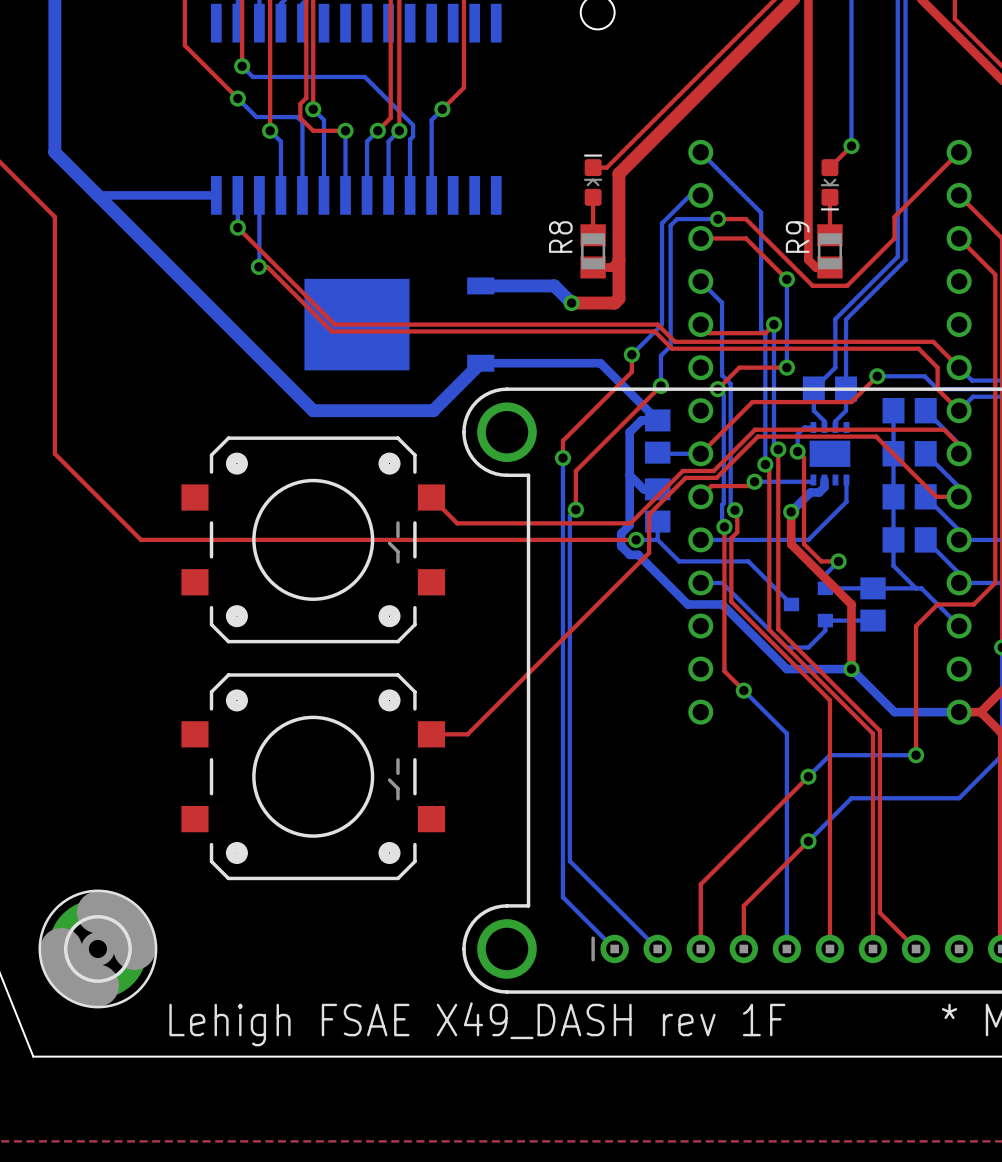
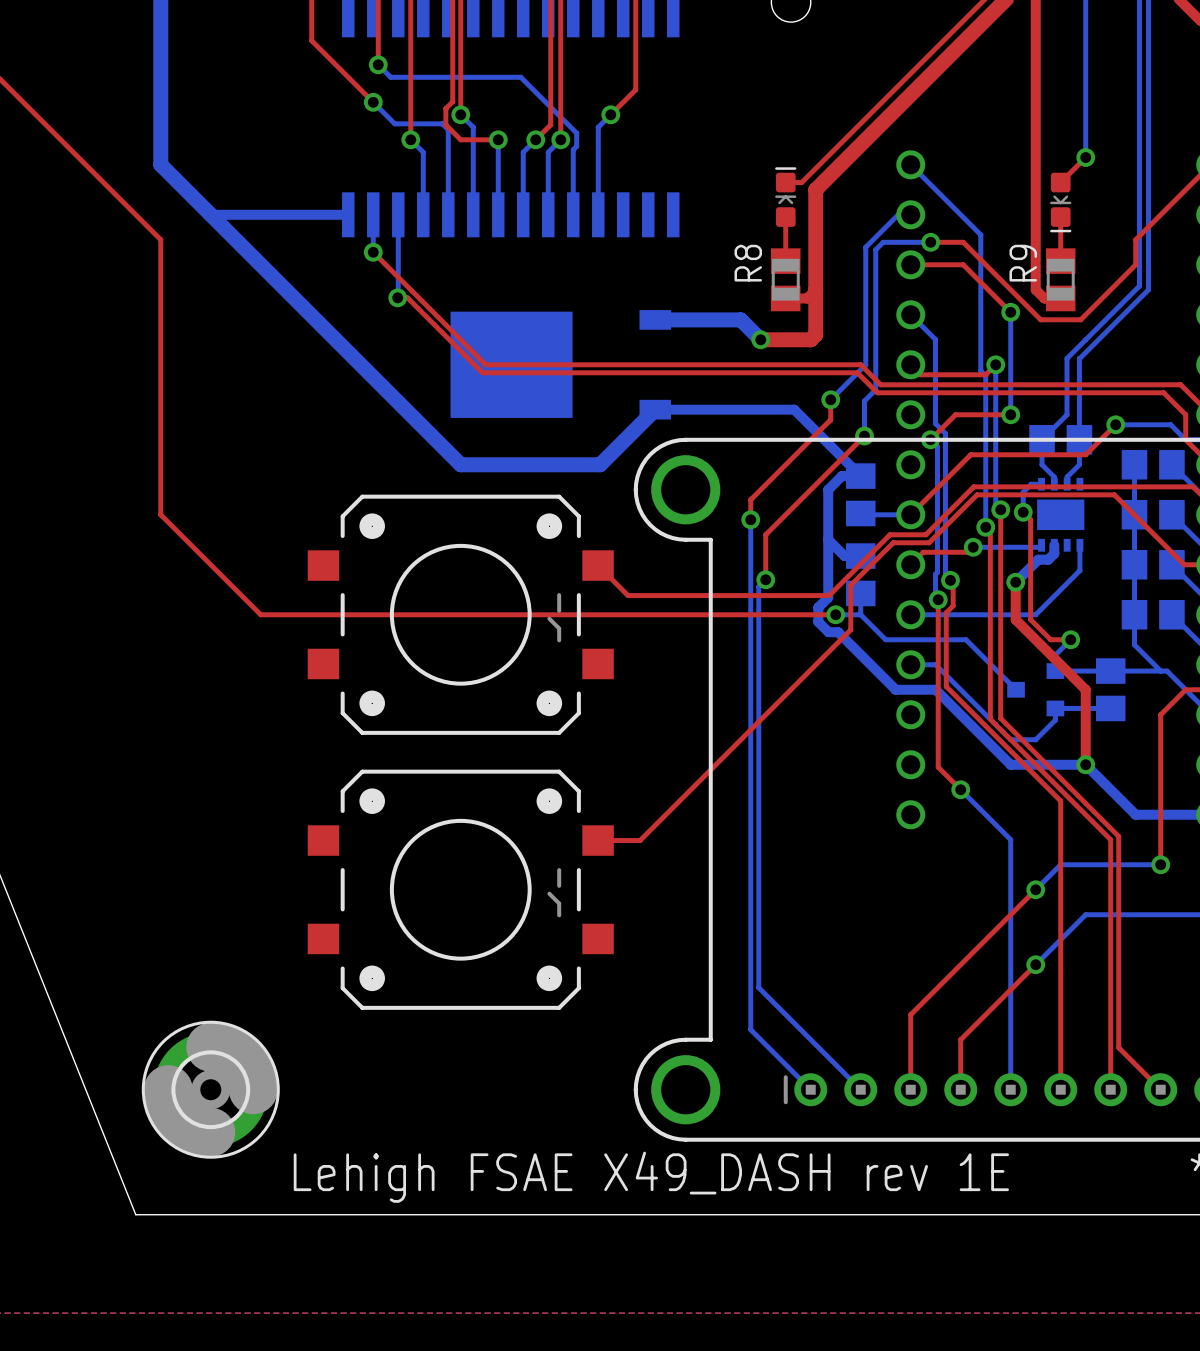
text: Lehigh FSAE X49_DASH rev 1F (477, 1024) -> Lehigh FSAE X49_DASH rev 1E (651, 1177)

